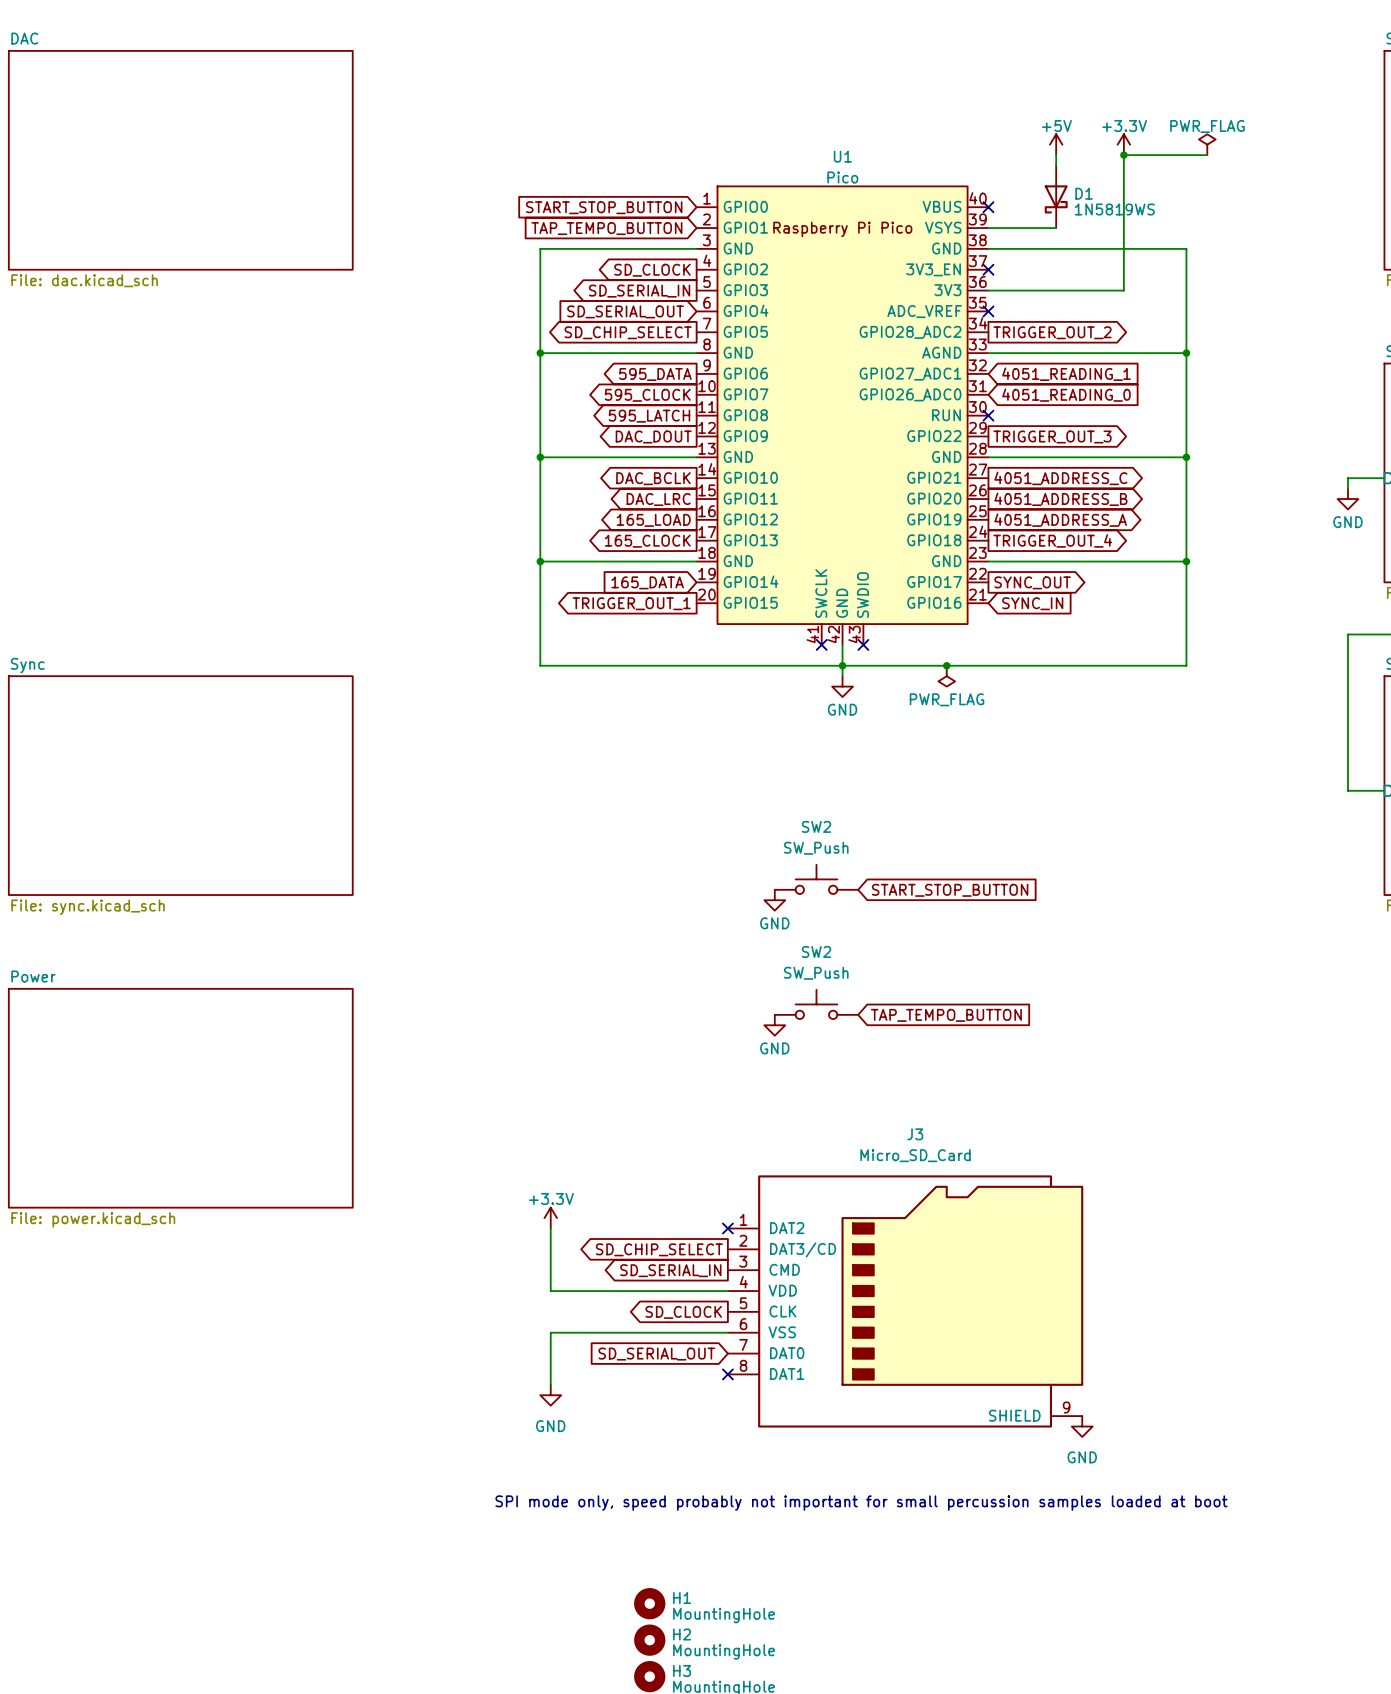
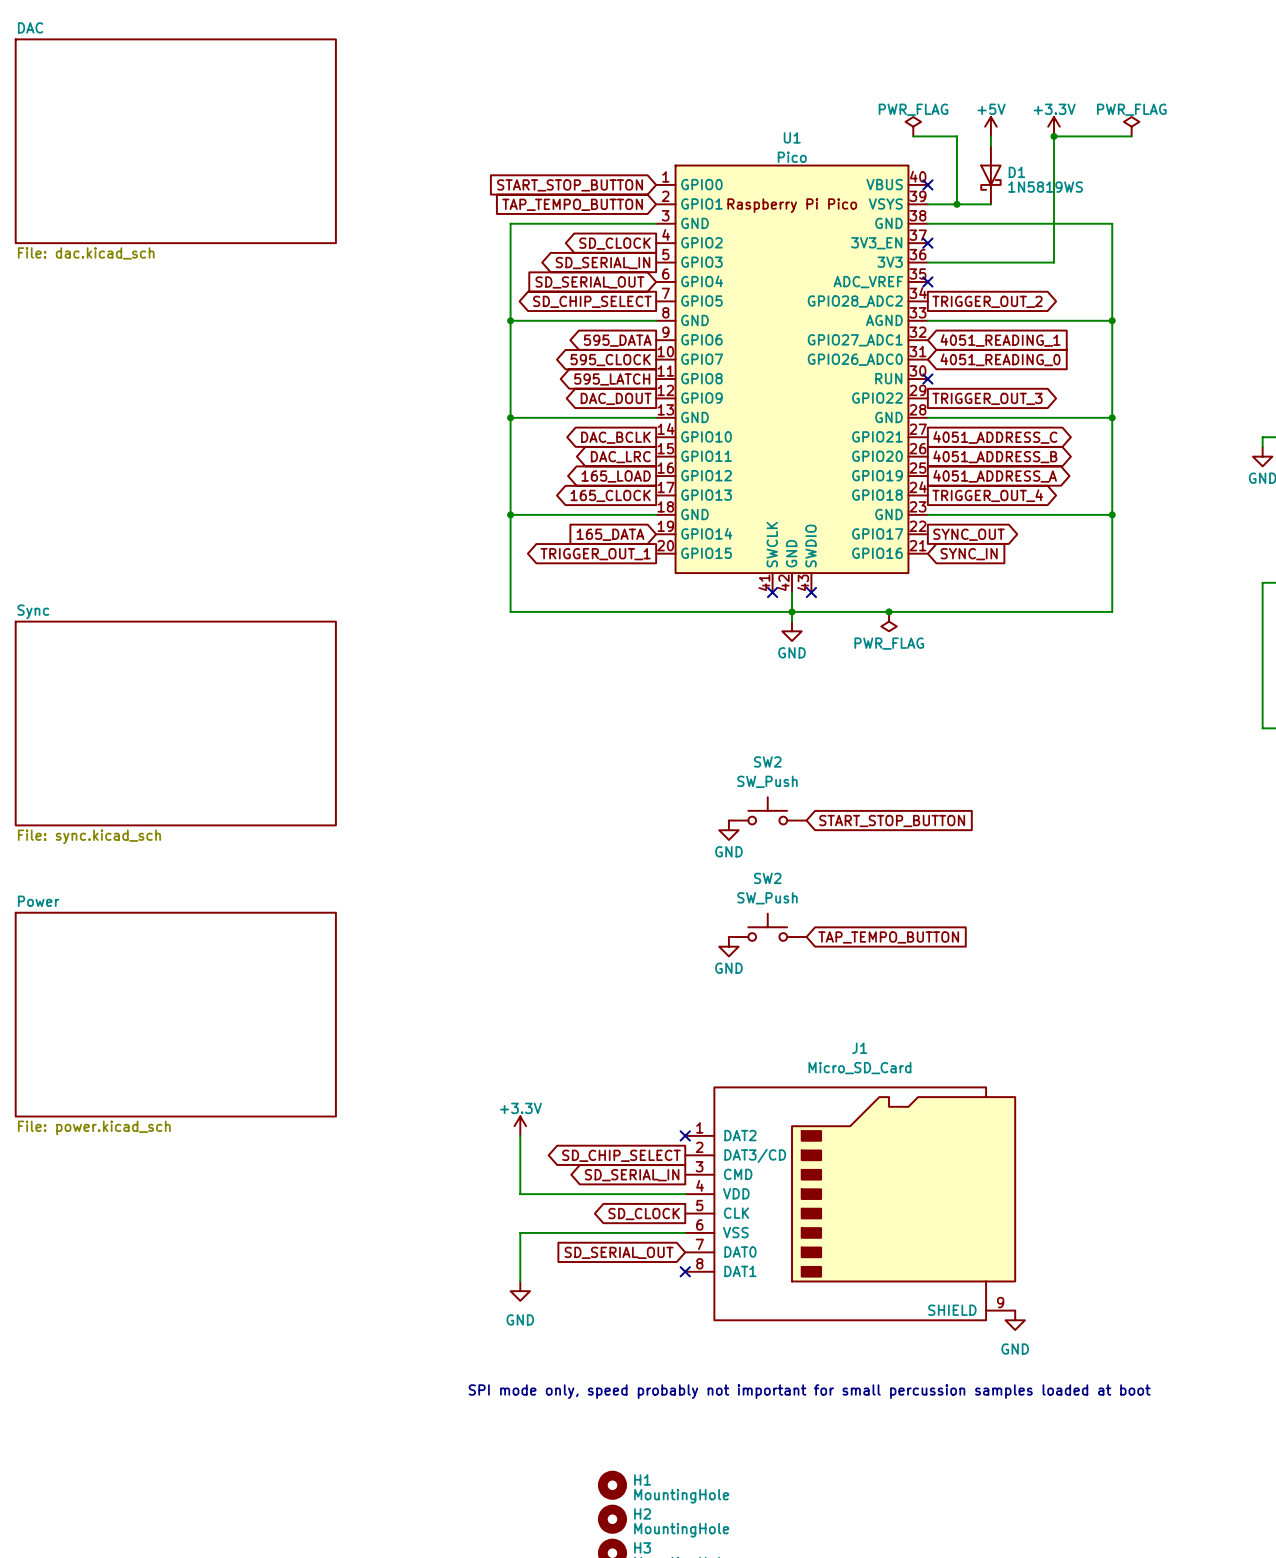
power symbol: none -> PWR_FLAG (913, 126)
wire: none -> (913, 136) (956, 136) (956, 204)
junction: none -> (956, 204)
J3 name: J3 (915, 1134) -> J1 (859, 1048)

